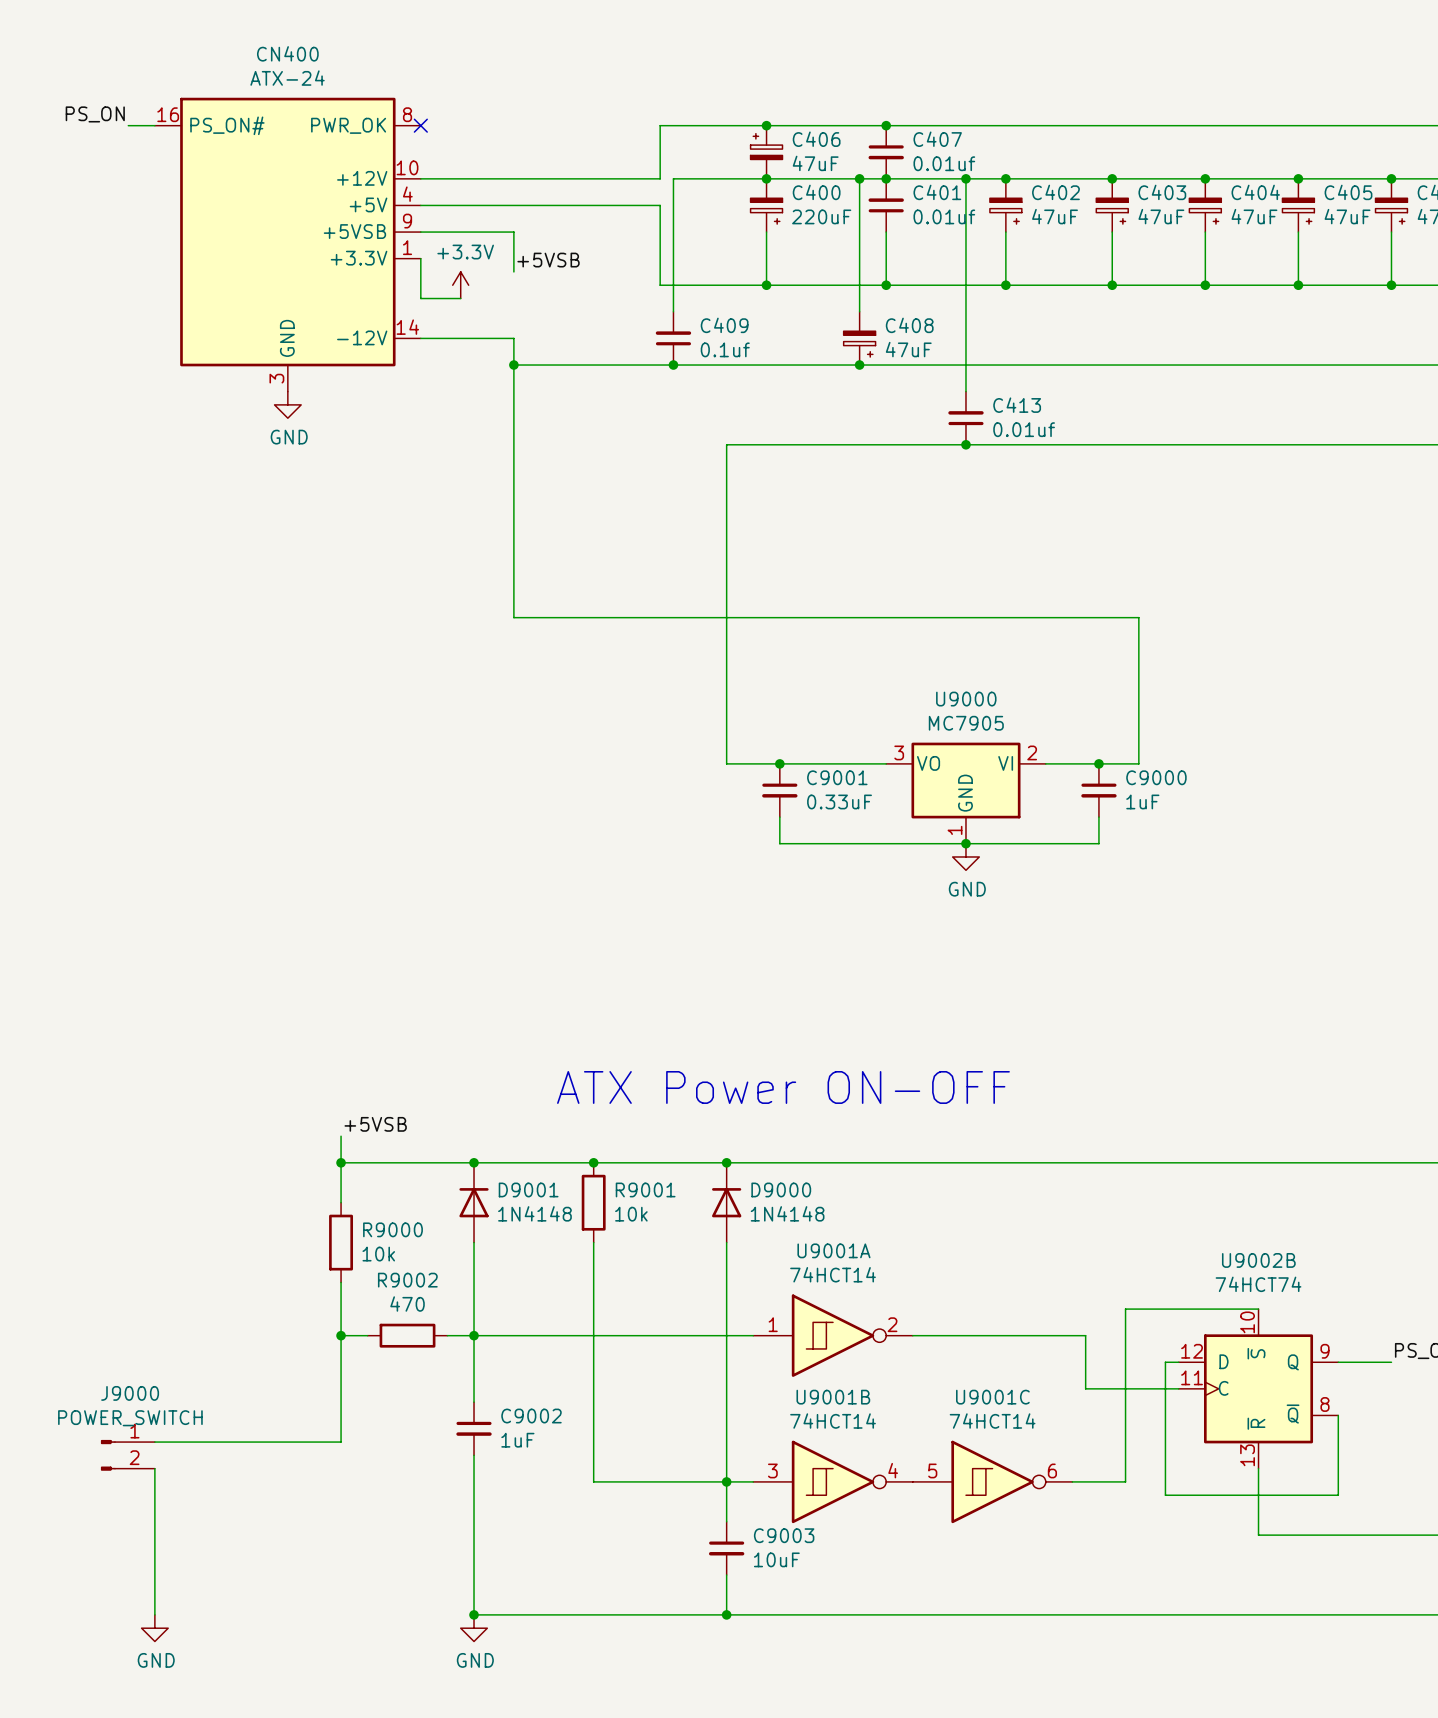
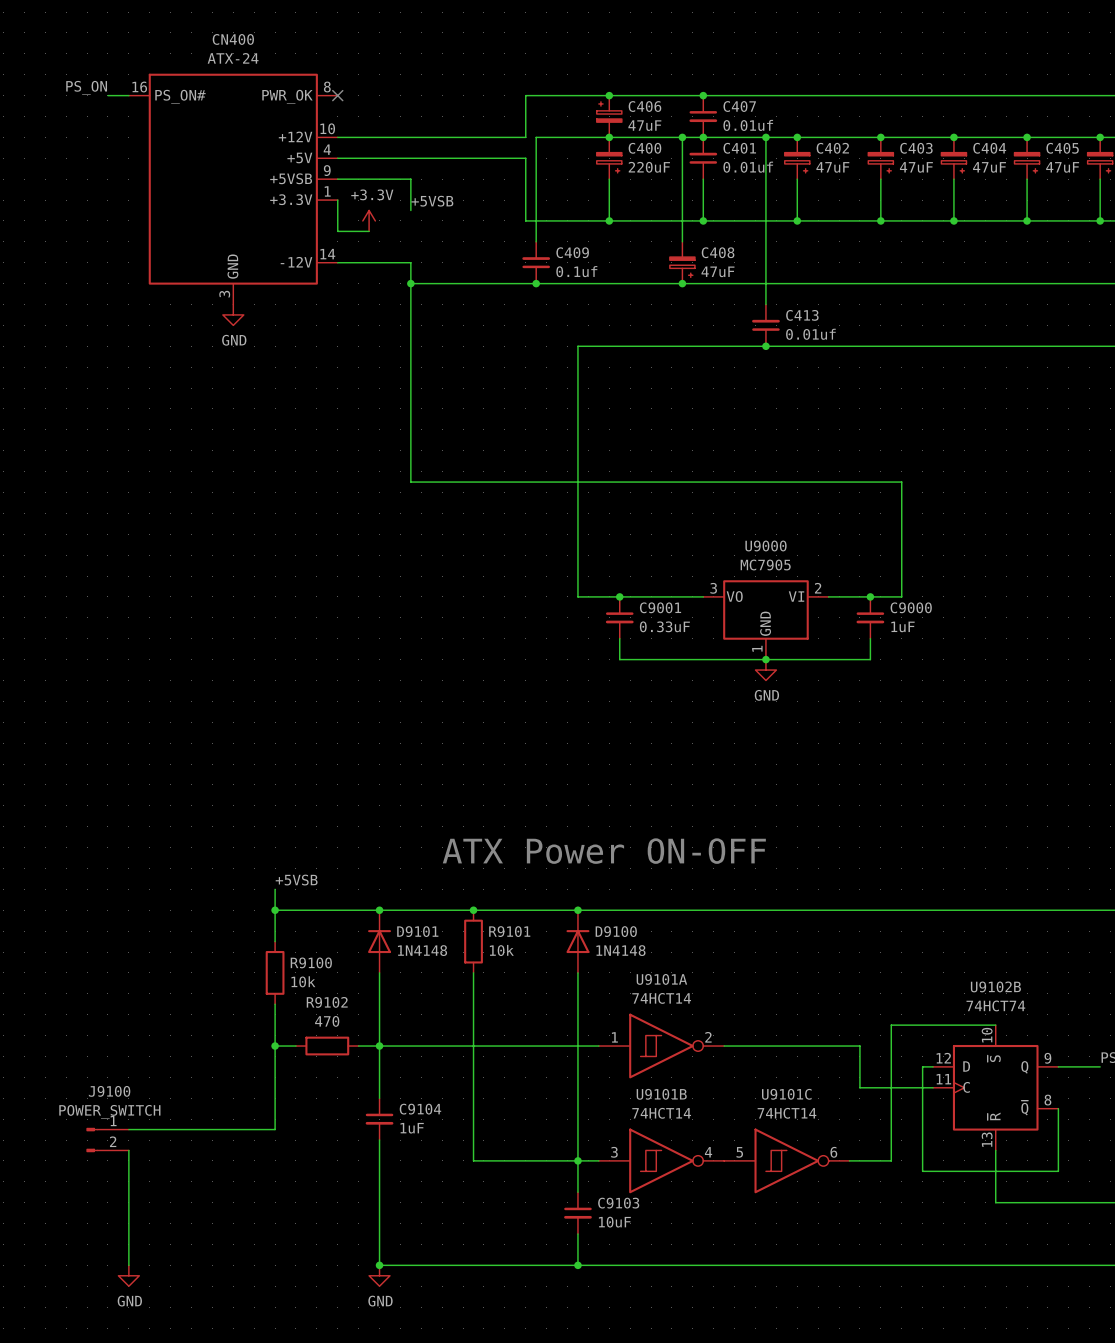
D9001 name: D9001 (528, 1189) -> D9101 (417, 931)
R9001 name: R9001 (645, 1189) -> R9101 (509, 931)
D9000 name: D9000 (781, 1189) -> D9100 (616, 931)
R9000 name: R9000 (393, 1229) -> R9100 (311, 962)
U9001A name: U9001A (833, 1250) -> U9101A (661, 979)
U9002B name: U9002B (1258, 1260) -> U9102B (995, 986)
R9002 name: R9002 (407, 1280) -> R9102 (327, 1002)
J9000 name: J9000 (130, 1393) -> J9100 (109, 1091)
U9001B name: U9001B (833, 1397) -> U9101B (661, 1094)
U9001C name: U9001C (992, 1397) -> U9101C (786, 1094)
C9002 name: C9002 (531, 1416) -> C9104 (420, 1109)
C9003 name: C9003 (784, 1535) -> C9103 (618, 1203)

